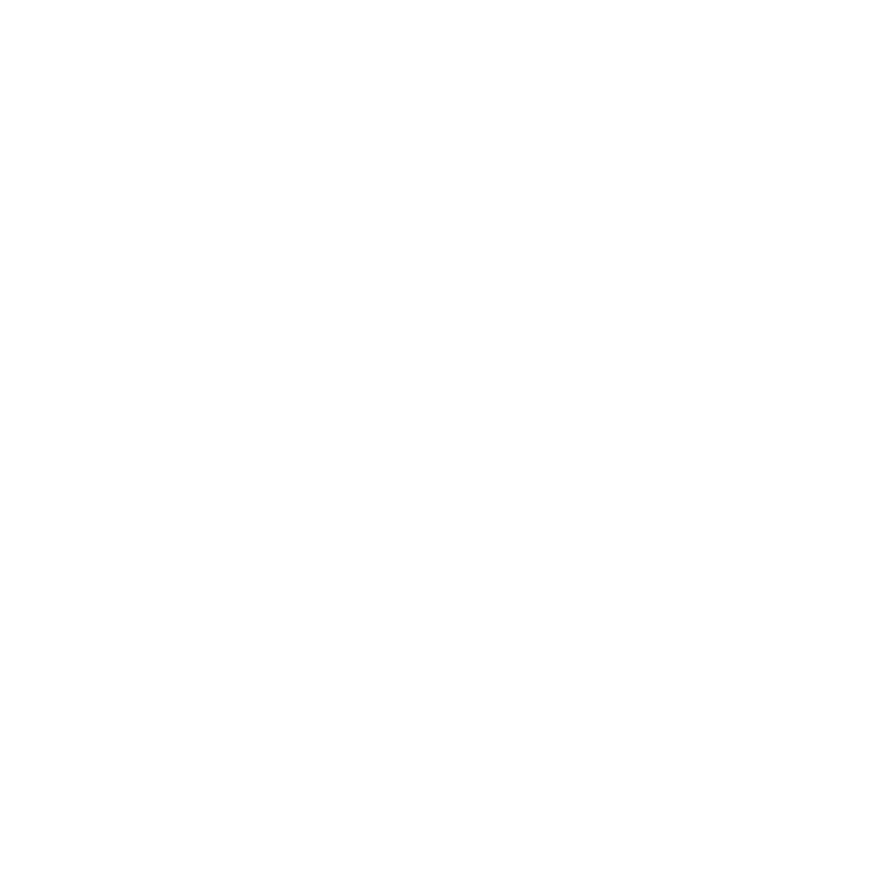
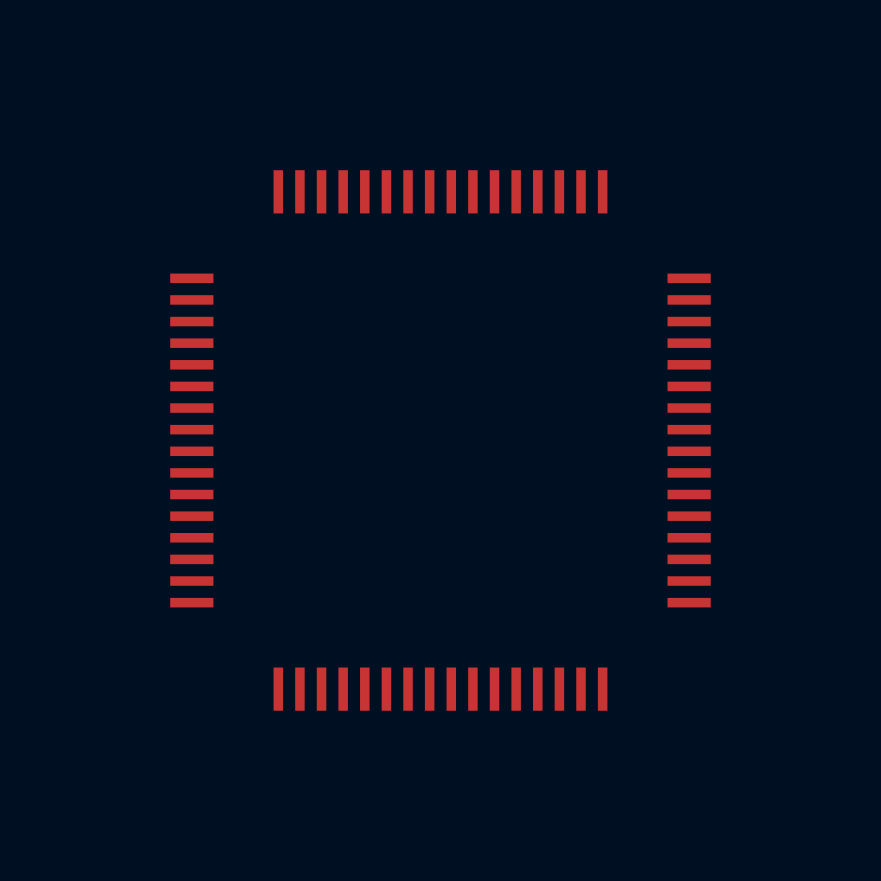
part: none -> (440, 440)

